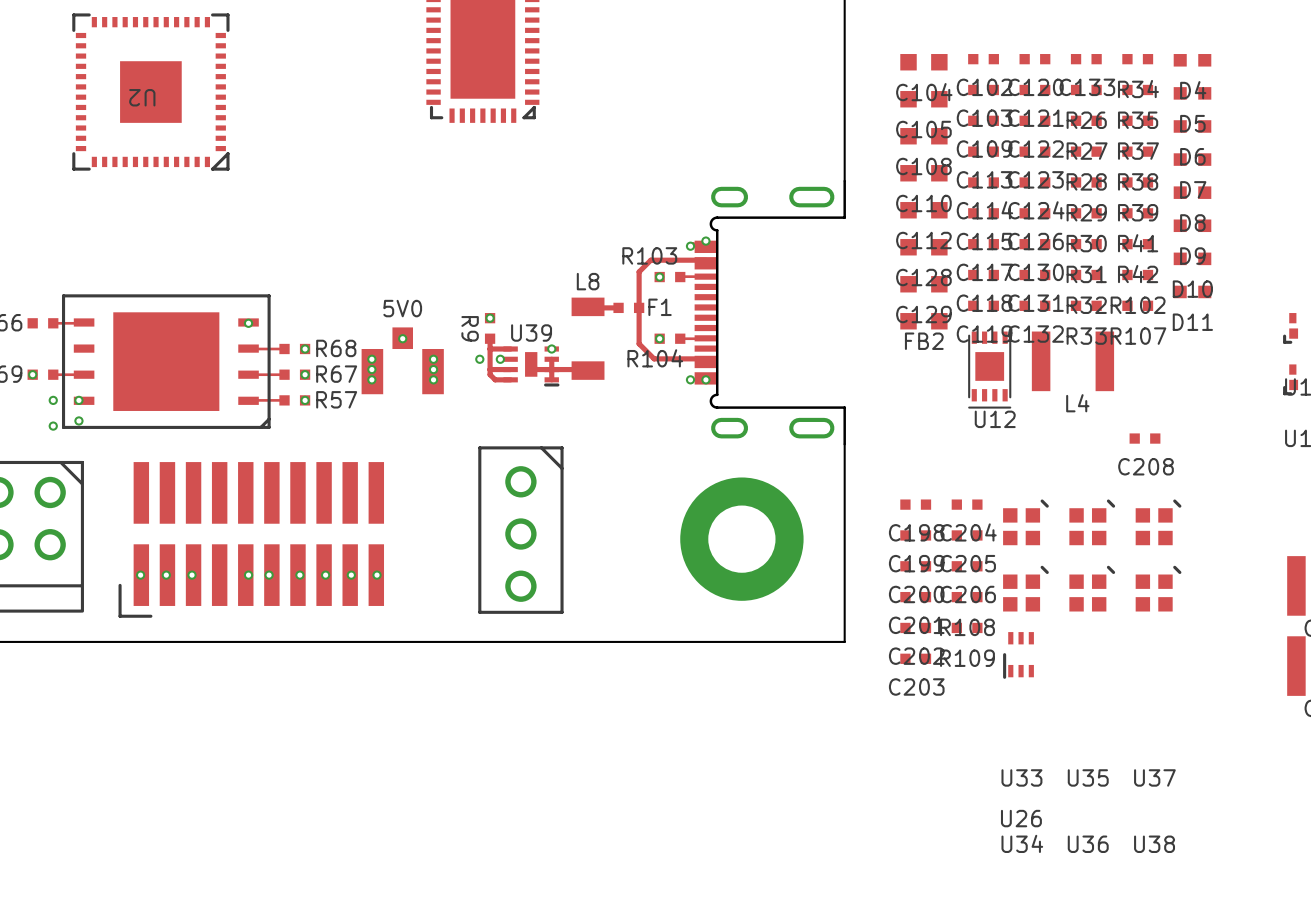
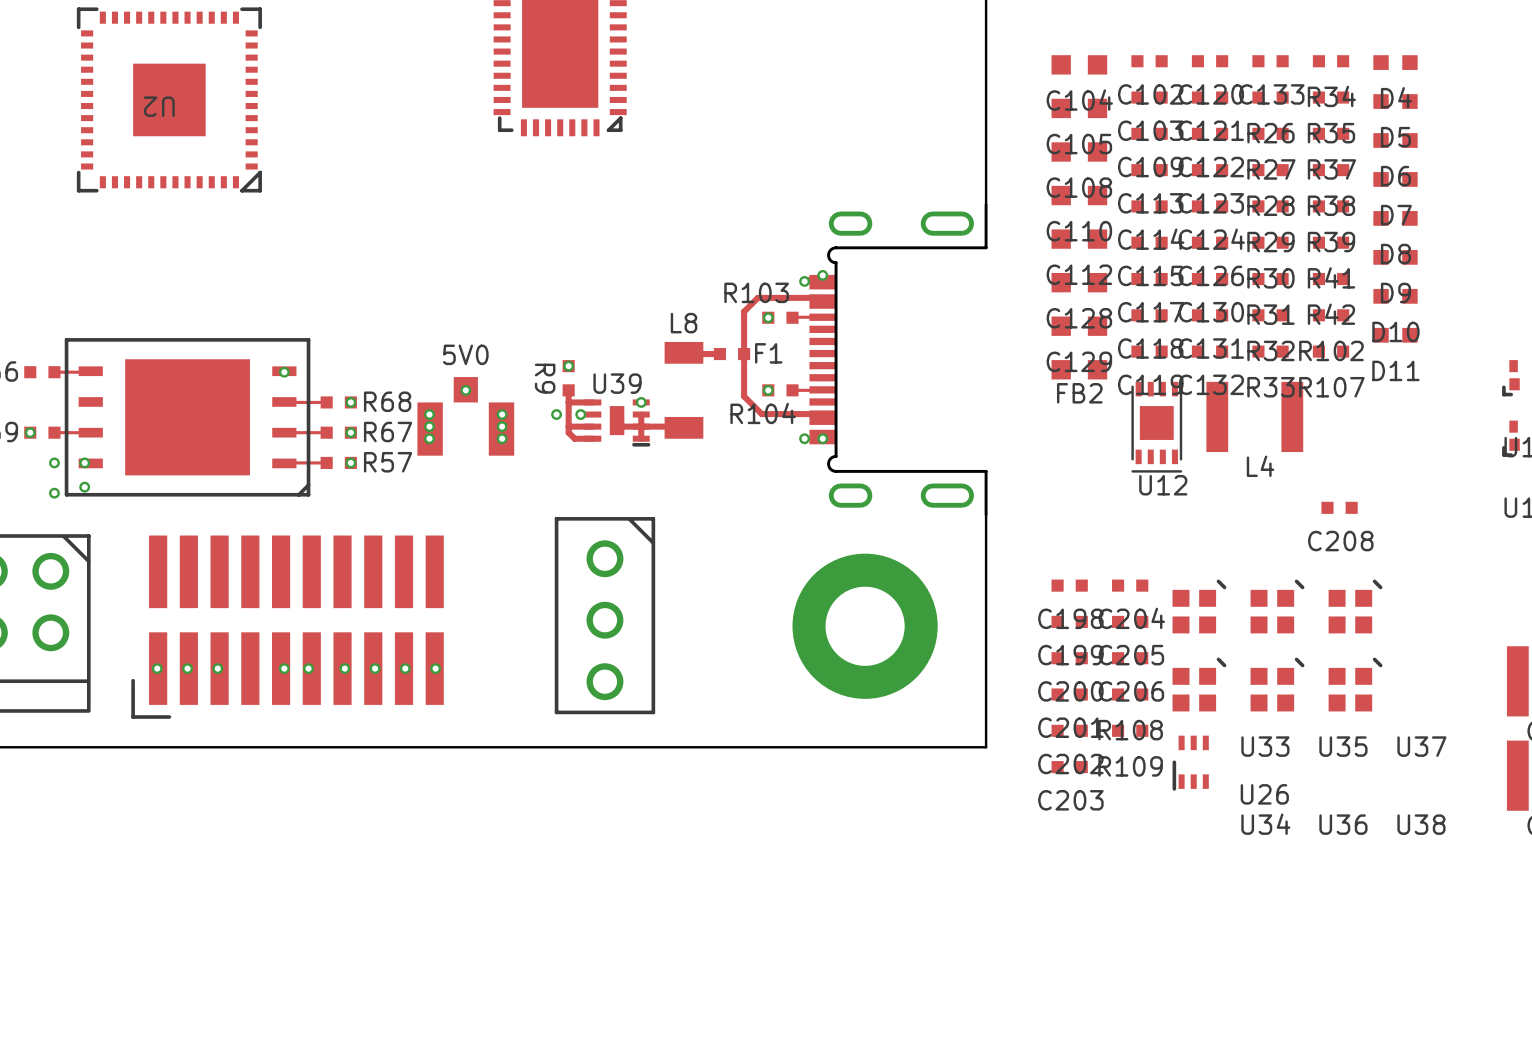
U33 name position: U33 (1021, 777) -> U33 (1265, 746)
U35 name position: U35 (1088, 777) -> U35 (1343, 746)
U37 name position: U37 (1154, 777) -> U37 (1421, 746)
U26 name position: U26 (1021, 818) -> U26 (1264, 794)
U34 name position: U34 (1022, 843) -> U34 (1265, 824)
U36 name position: U36 (1088, 844) -> U36 (1343, 824)
U38 name position: U38 (1154, 844) -> U38 (1421, 824)

